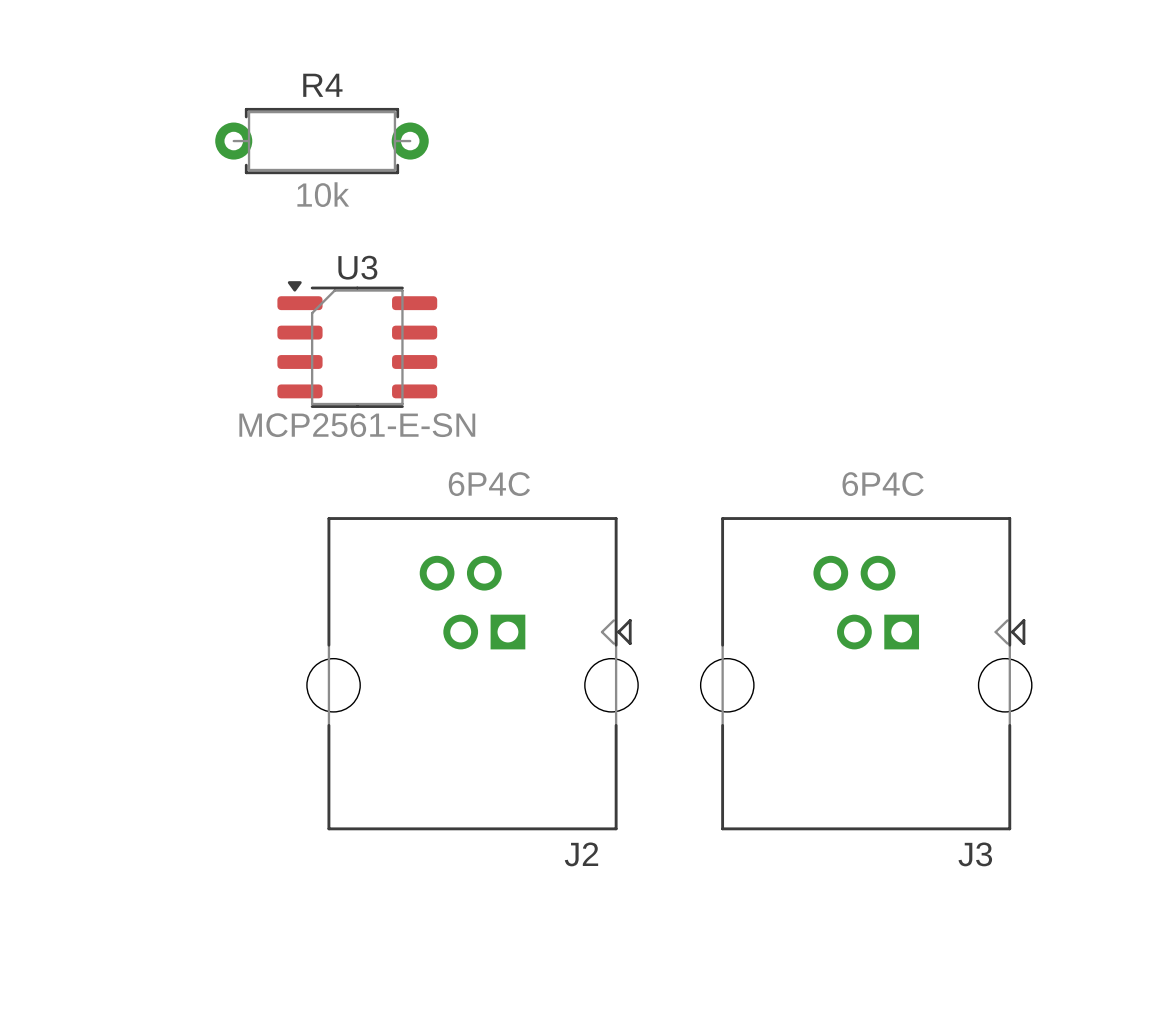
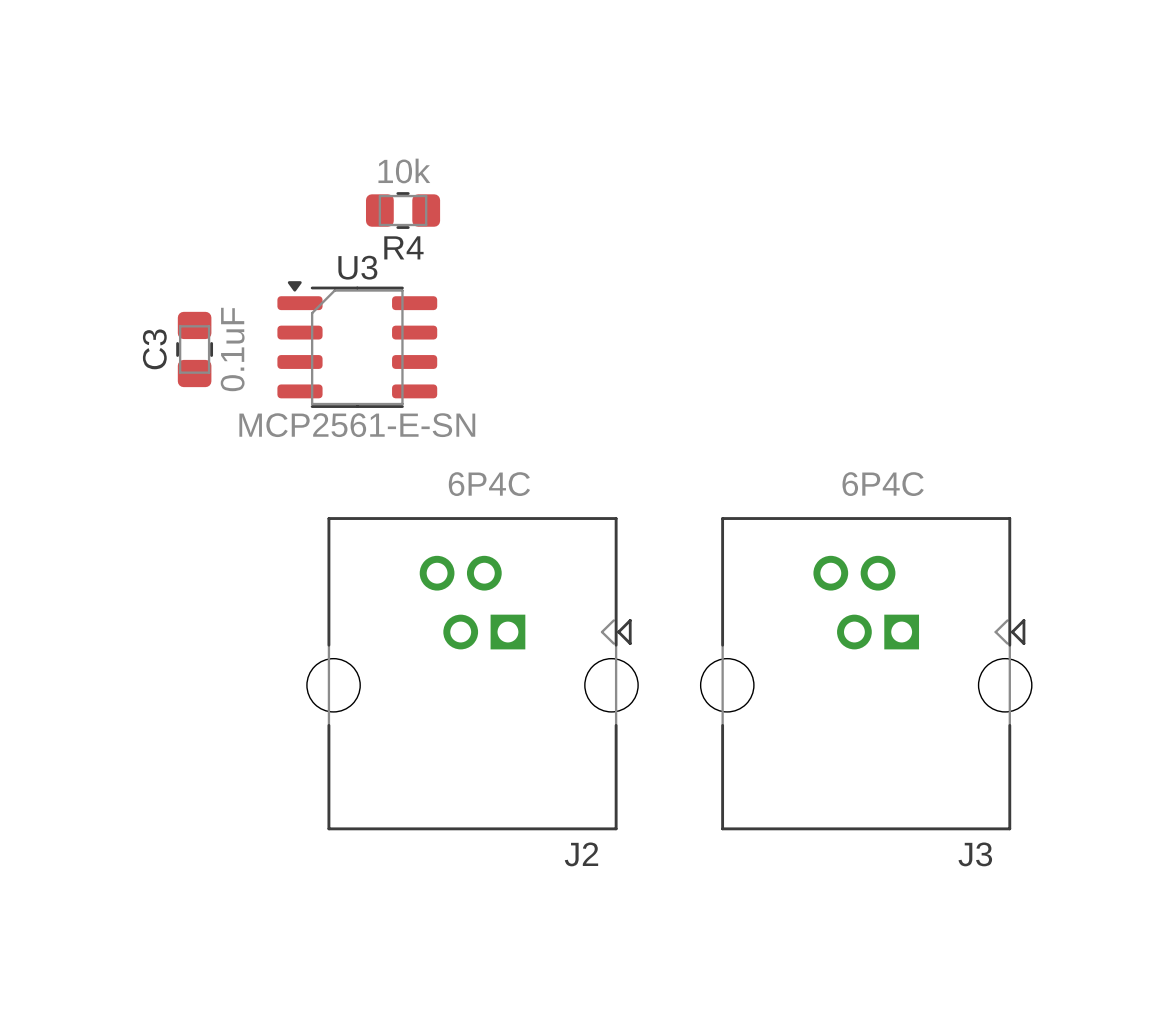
R4 name position: R4 (322, 85) -> R4 (403, 247)
R4 footprint: [215, 107, 429, 175] -> [365, 192, 441, 229]
R4 value position: 10k (323, 194) -> 10k (404, 171)
C3: none -> 0.1uF (194, 349)

